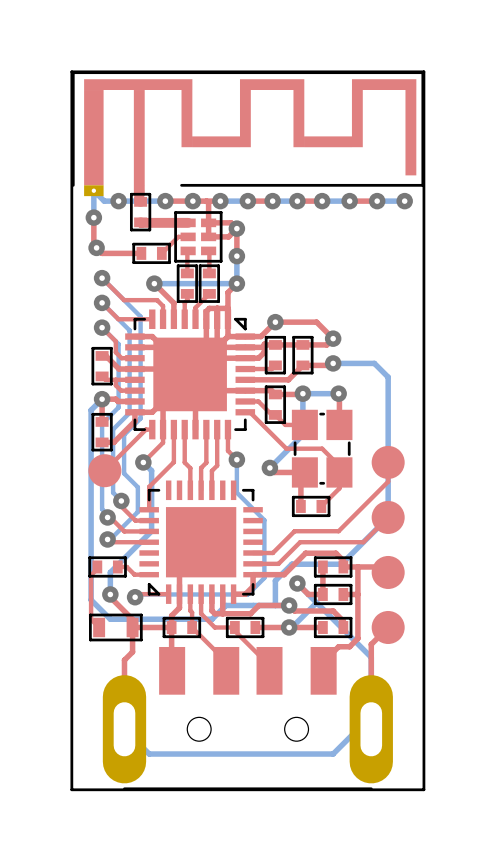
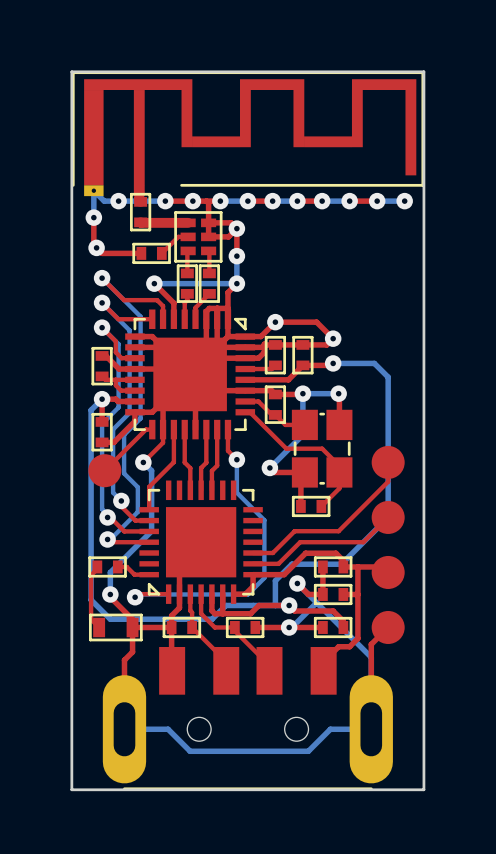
bottom track: (124, 729) (149, 754) (333, 754) (357, 729) -> (124, 729) (168, 729) (190, 751) (308, 751) (330, 729) (357, 729)

